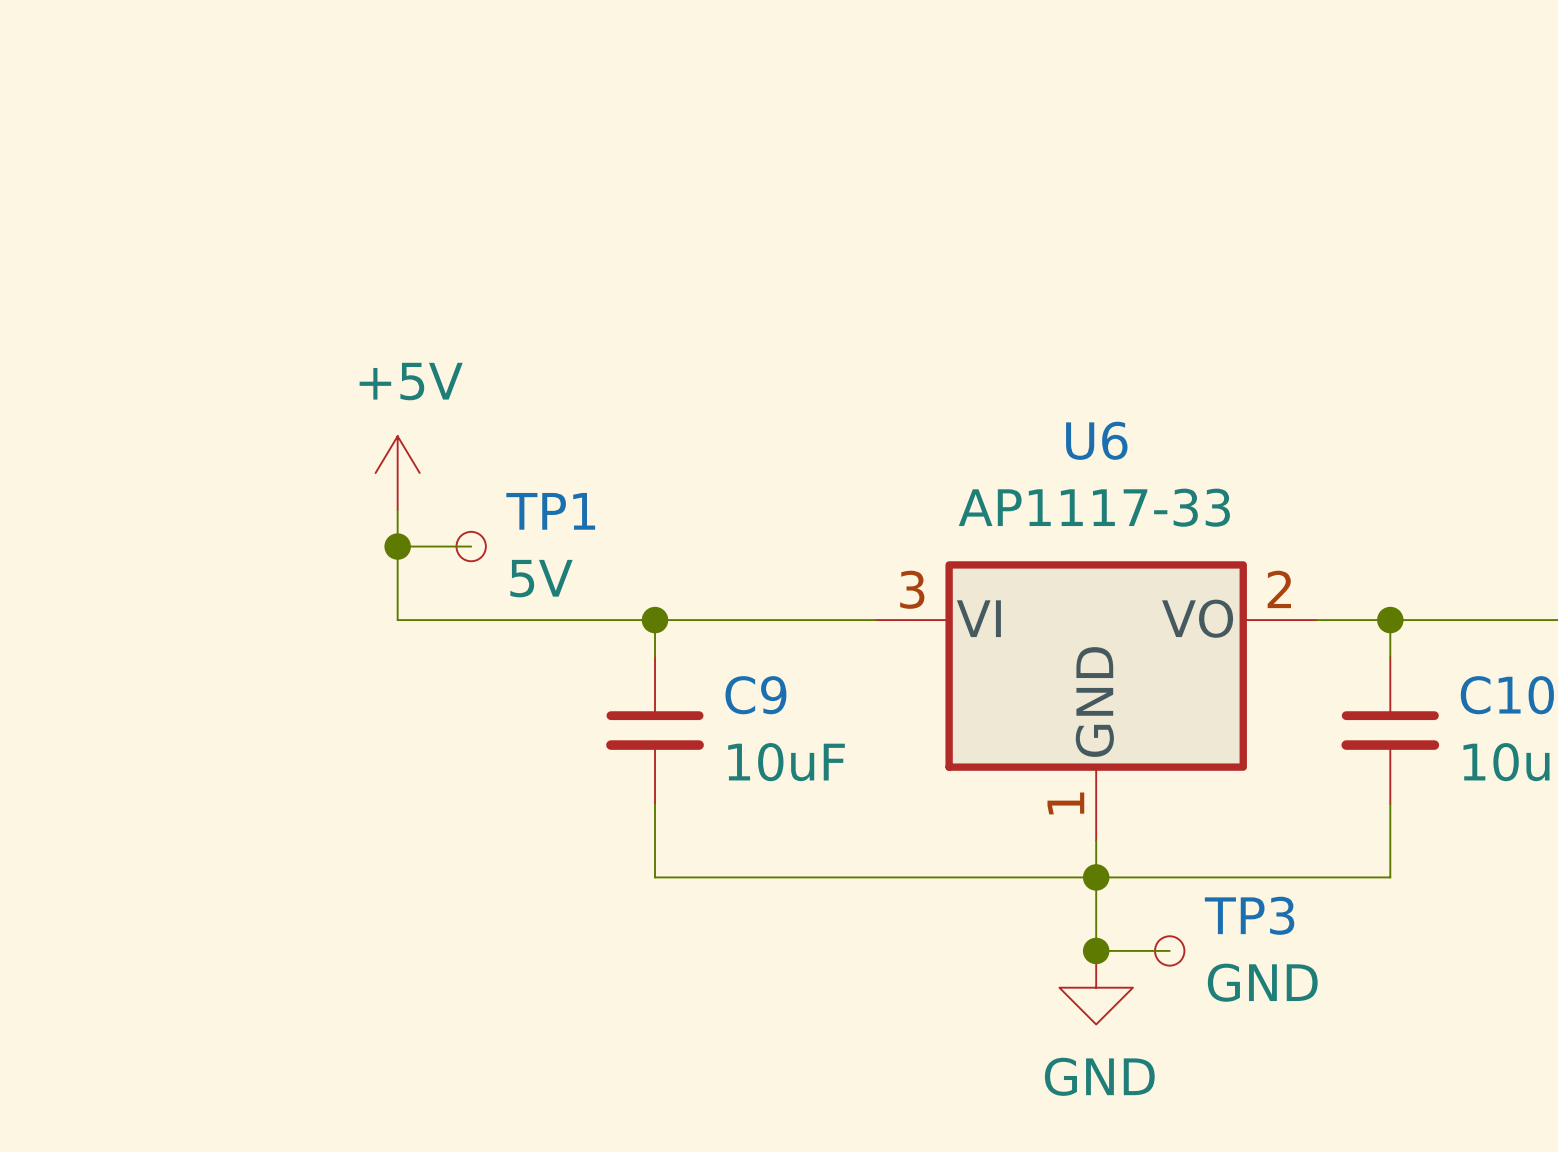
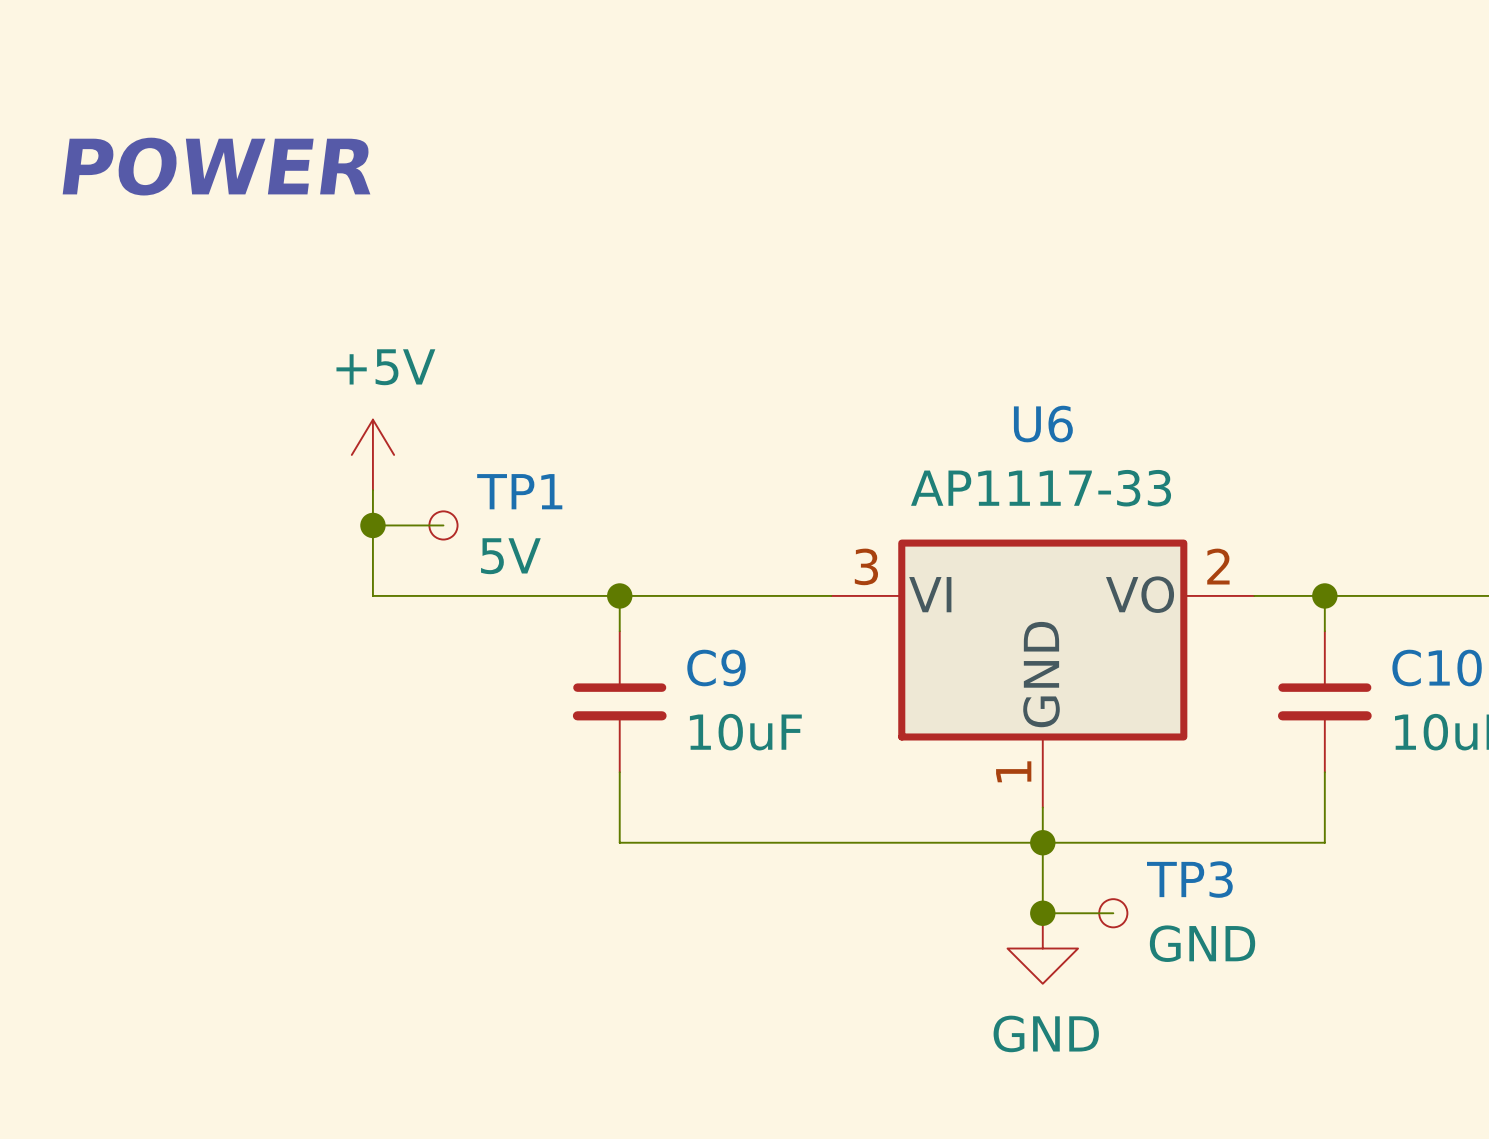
text: none -> POWER (216, 166)

